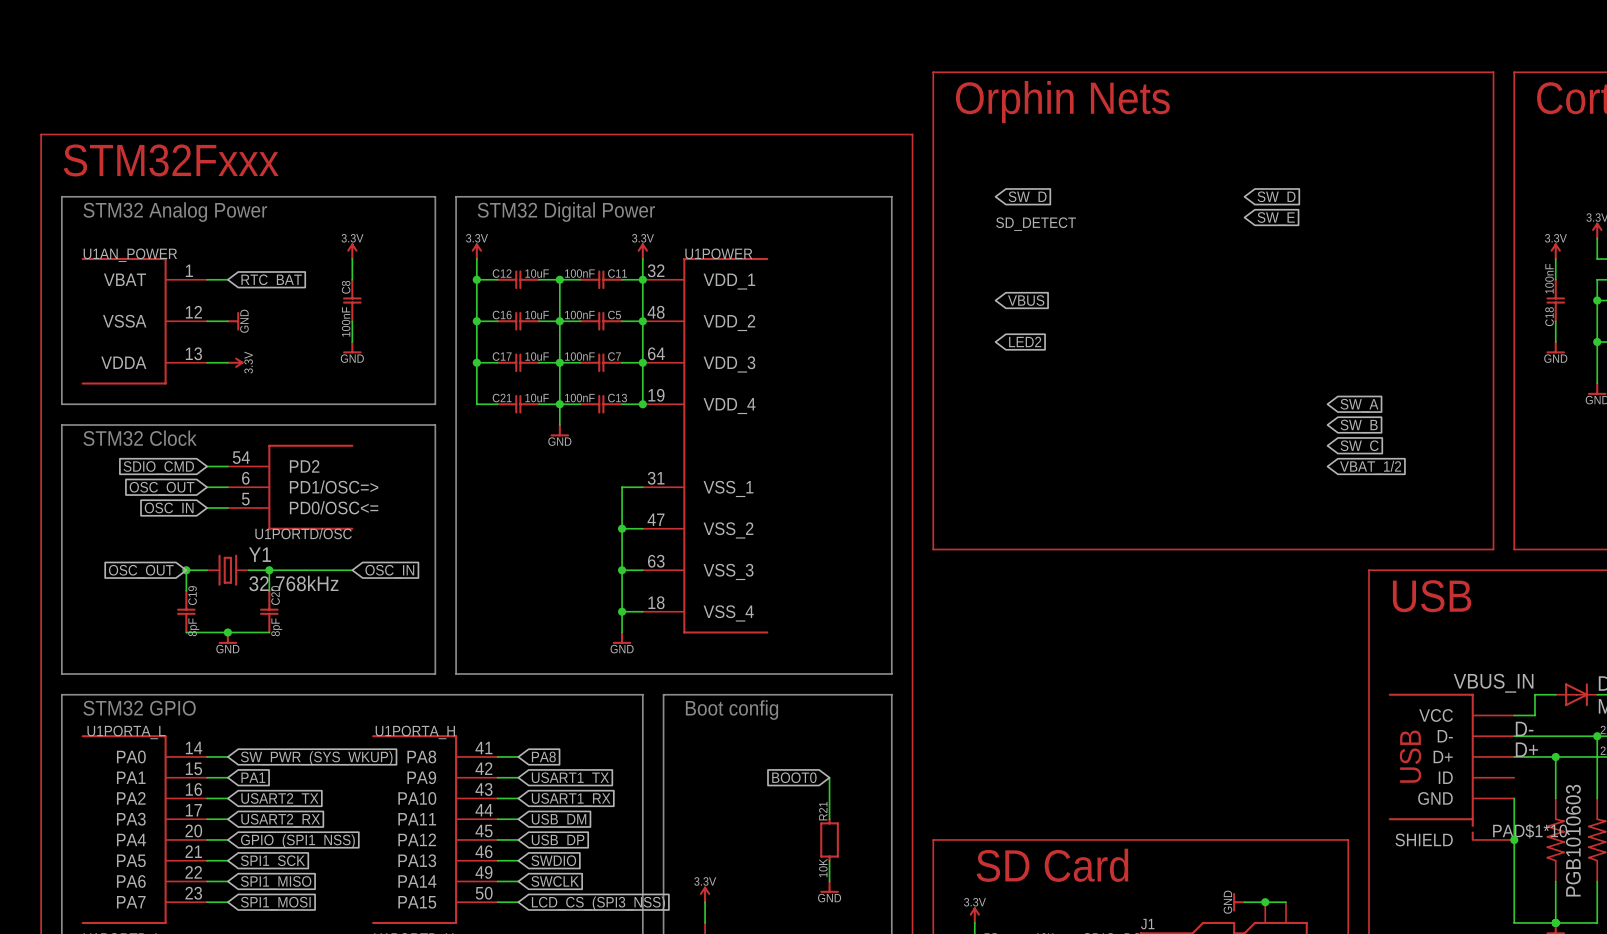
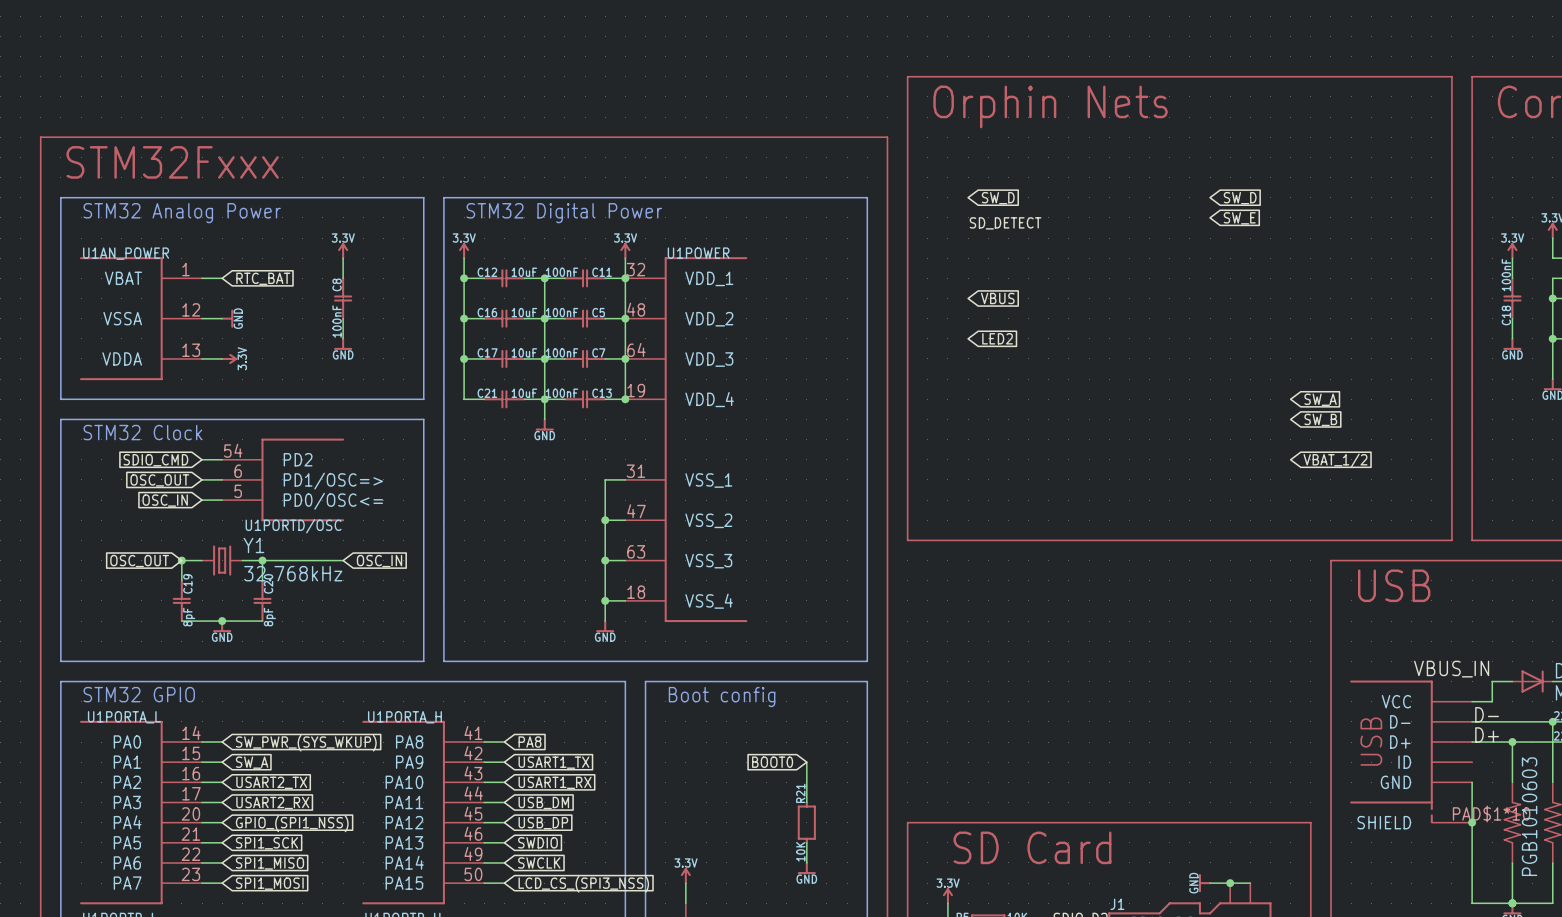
global label: SW_C (1359, 447) -> none
global label: PA1 (253, 777) -> SW_A (252, 762)

